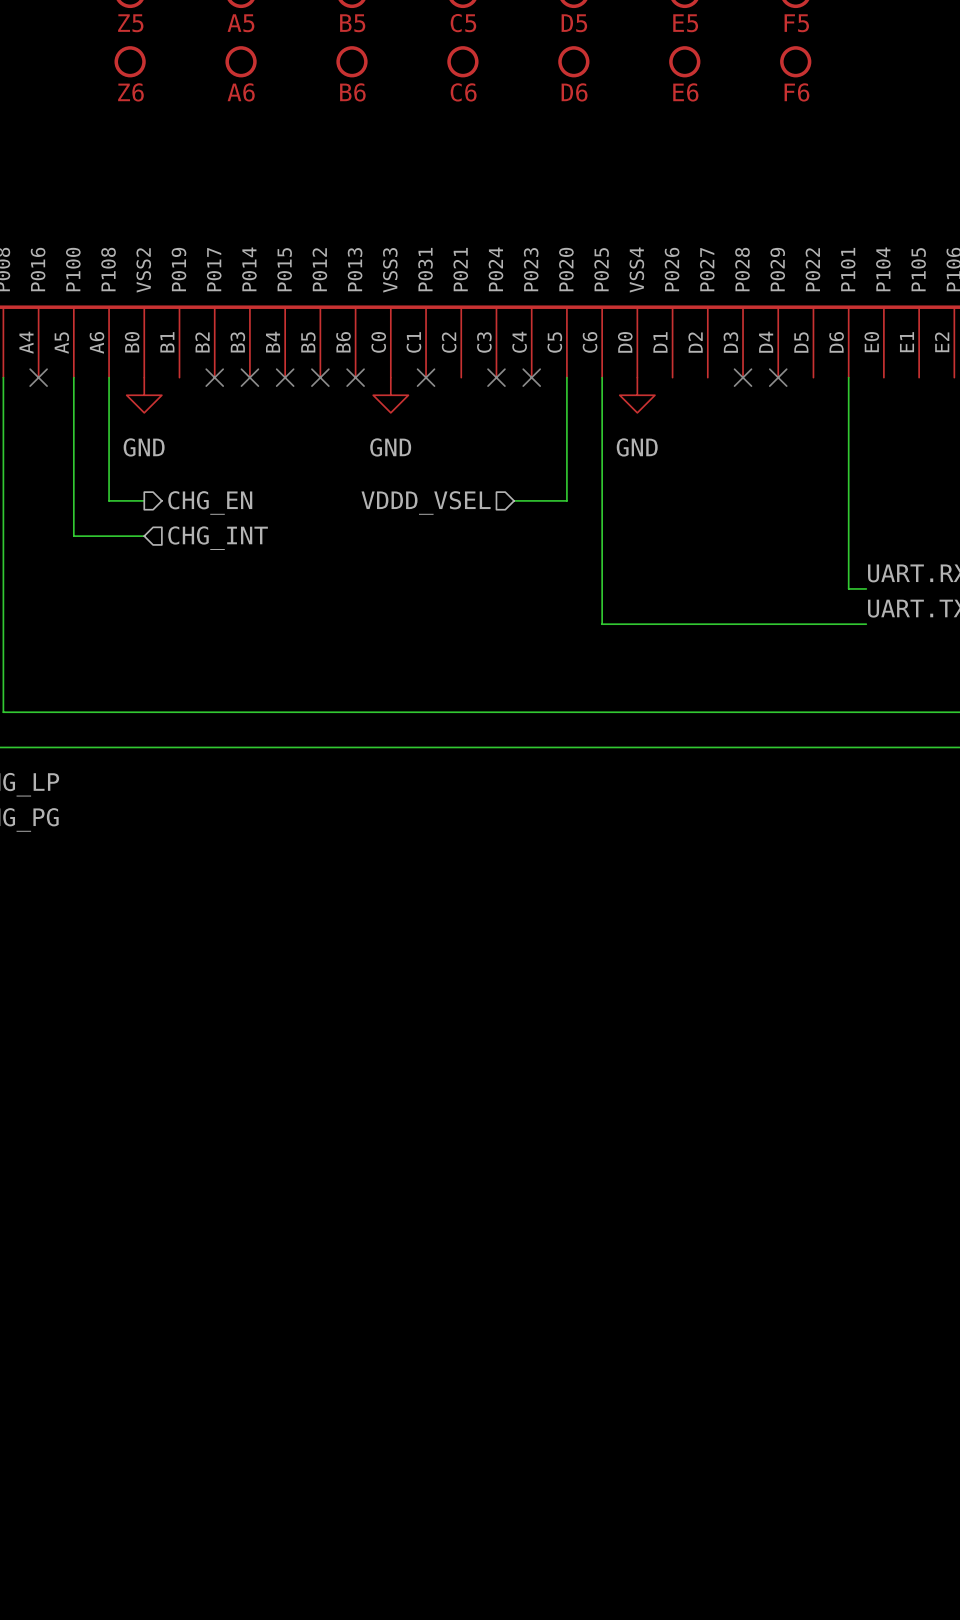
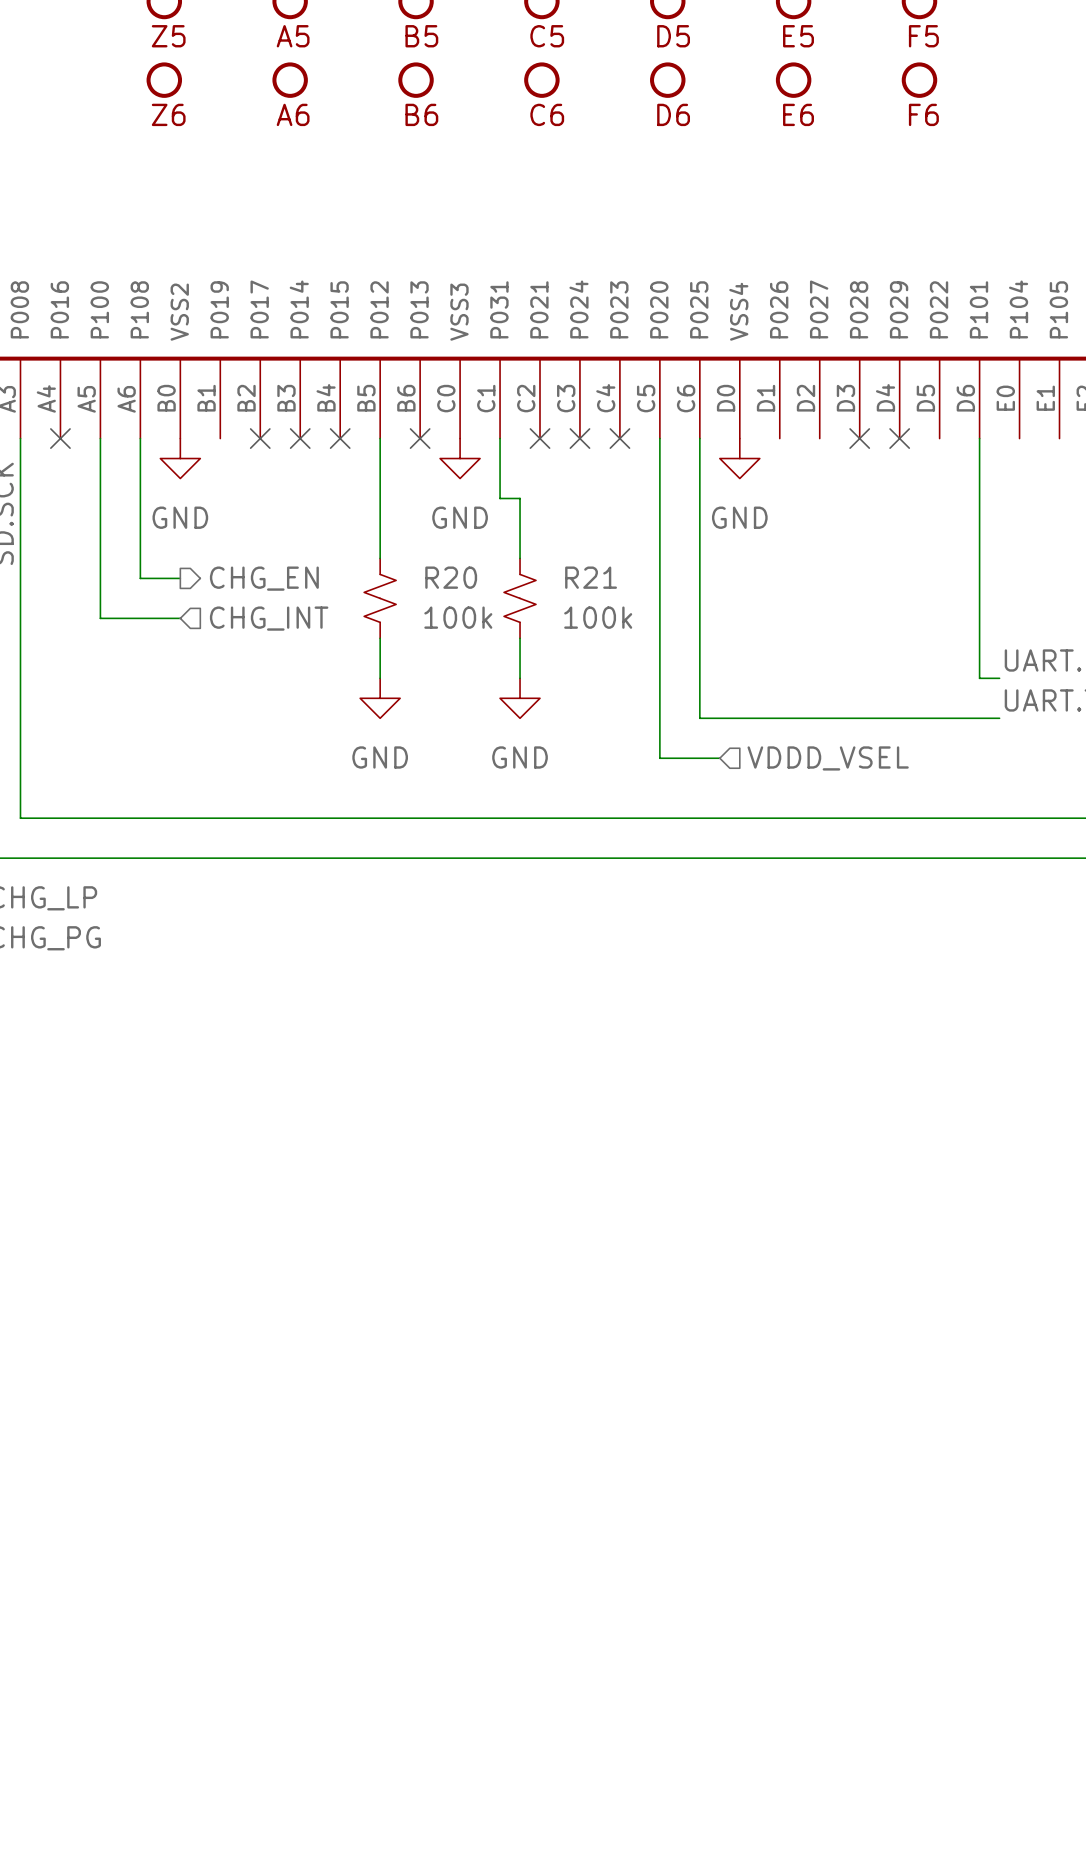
wire: none -> (380, 438) (380, 558)
no-connect mark: (320, 377) -> none
wire: none -> (500, 438) (500, 498) (520, 498) (520, 558)
no-connect mark position: (426, 377) -> (540, 438)
wire: (514, 500) (566, 500) -> (719, 758) (659, 758) (659, 578)
hierarchical label rotation: 0° (426, 502) -> 180° (828, 758)
hierarchical label position: VDDD_VSEL (426, 502) -> VDDD_VSEL (828, 758)
R20: none -> 100k (380, 598)
R21: none -> 100k (520, 598)
wire: none -> (380, 638) (380, 678)
wire: none -> (520, 638) (520, 678)
power symbol: none -> GND (380, 698)
power symbol: none -> GND (520, 698)

